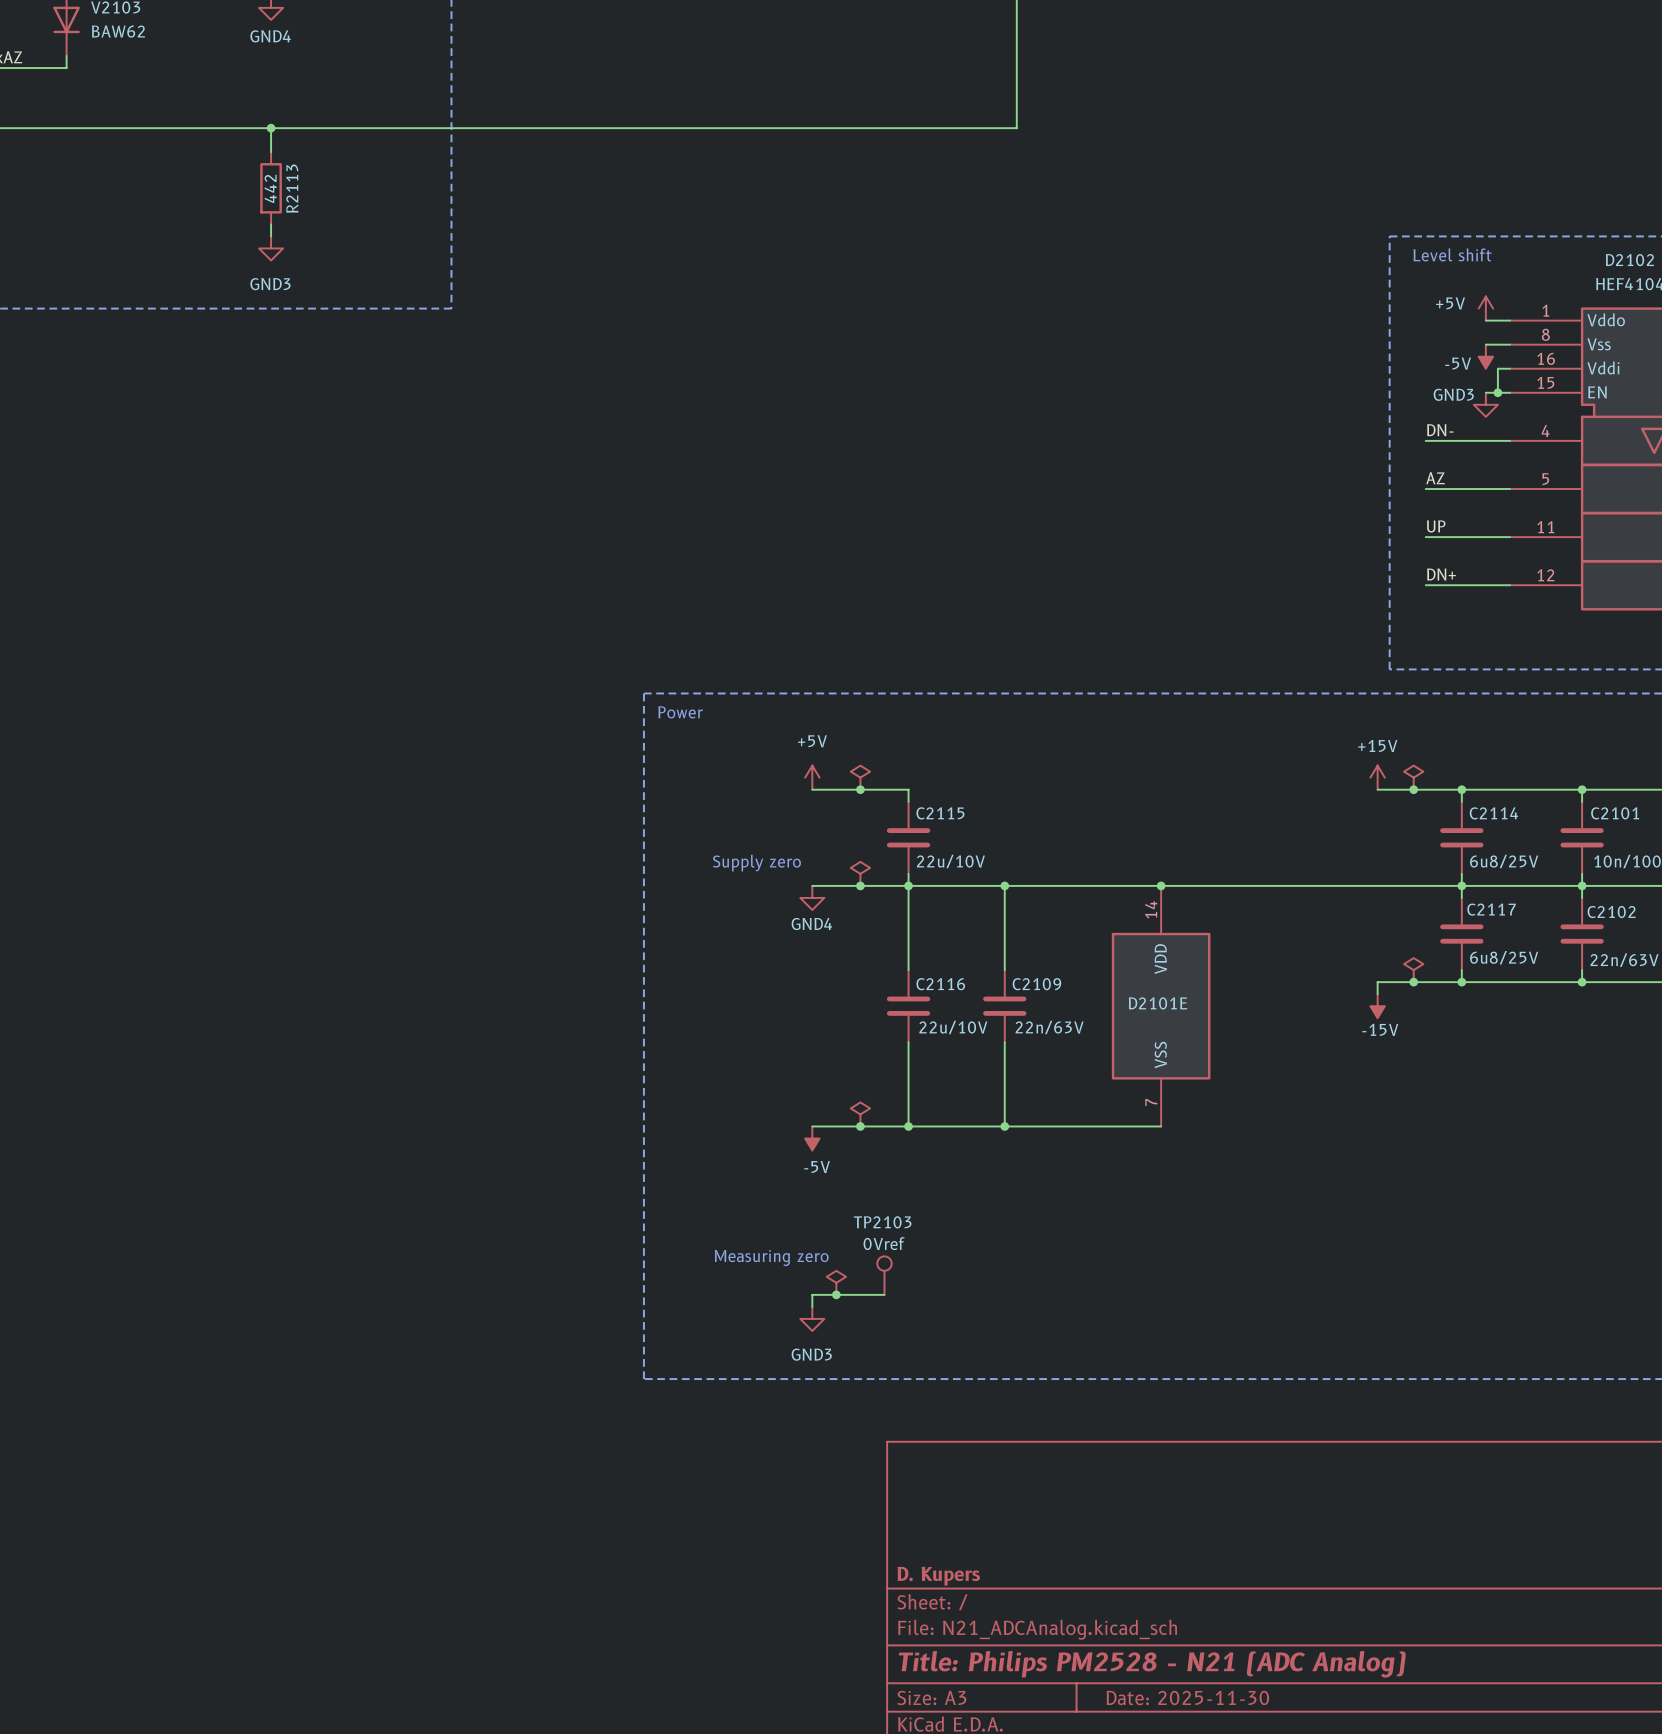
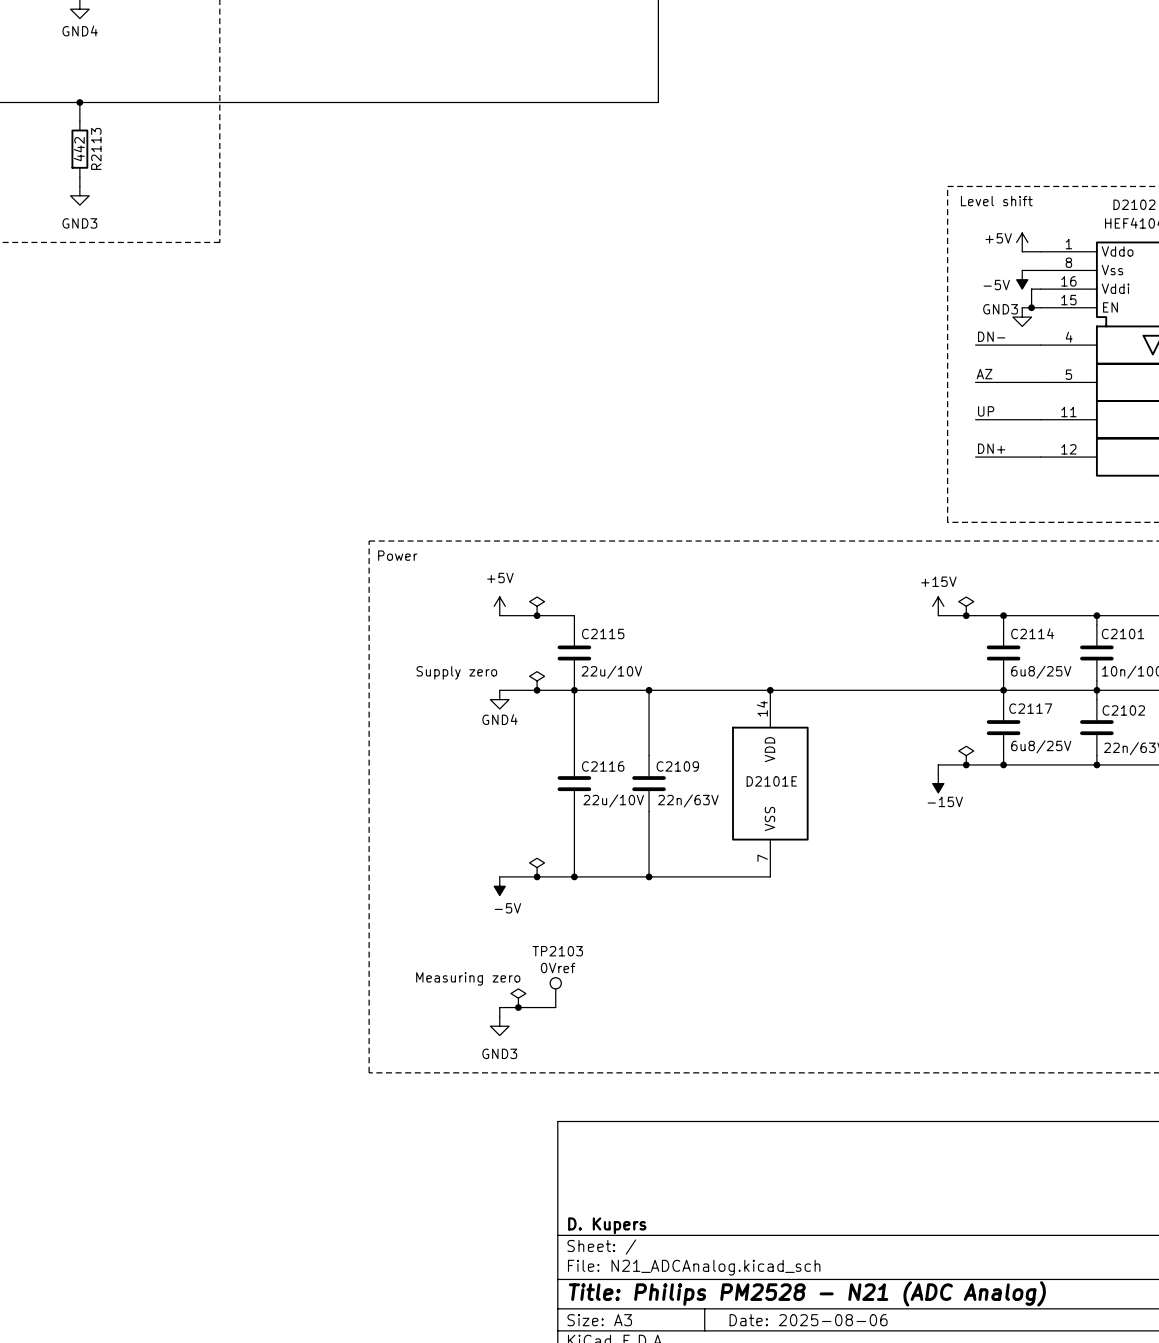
title block: Date: 2025-11-30 (1187, 1697) -> Date: 2025-08-06 (808, 1320)

